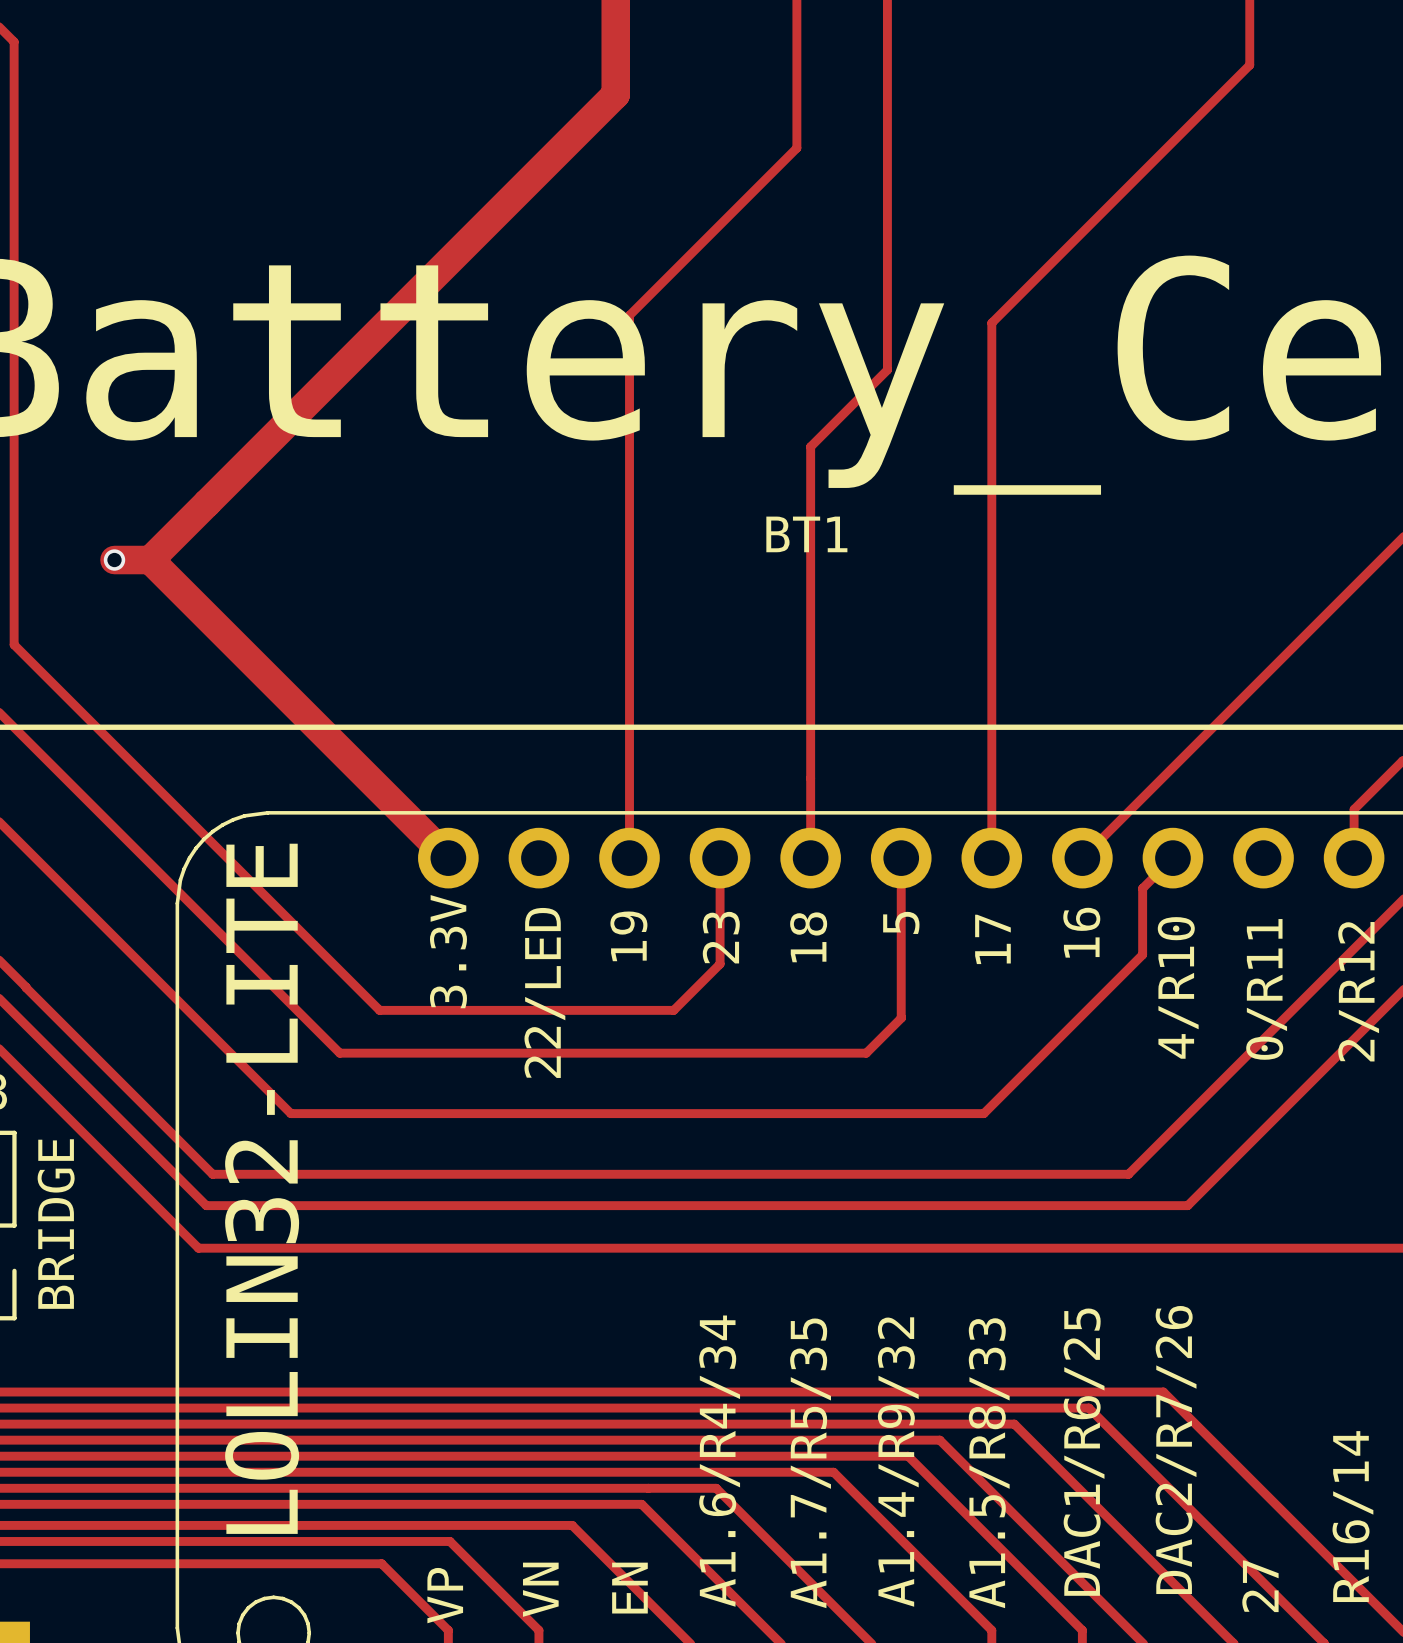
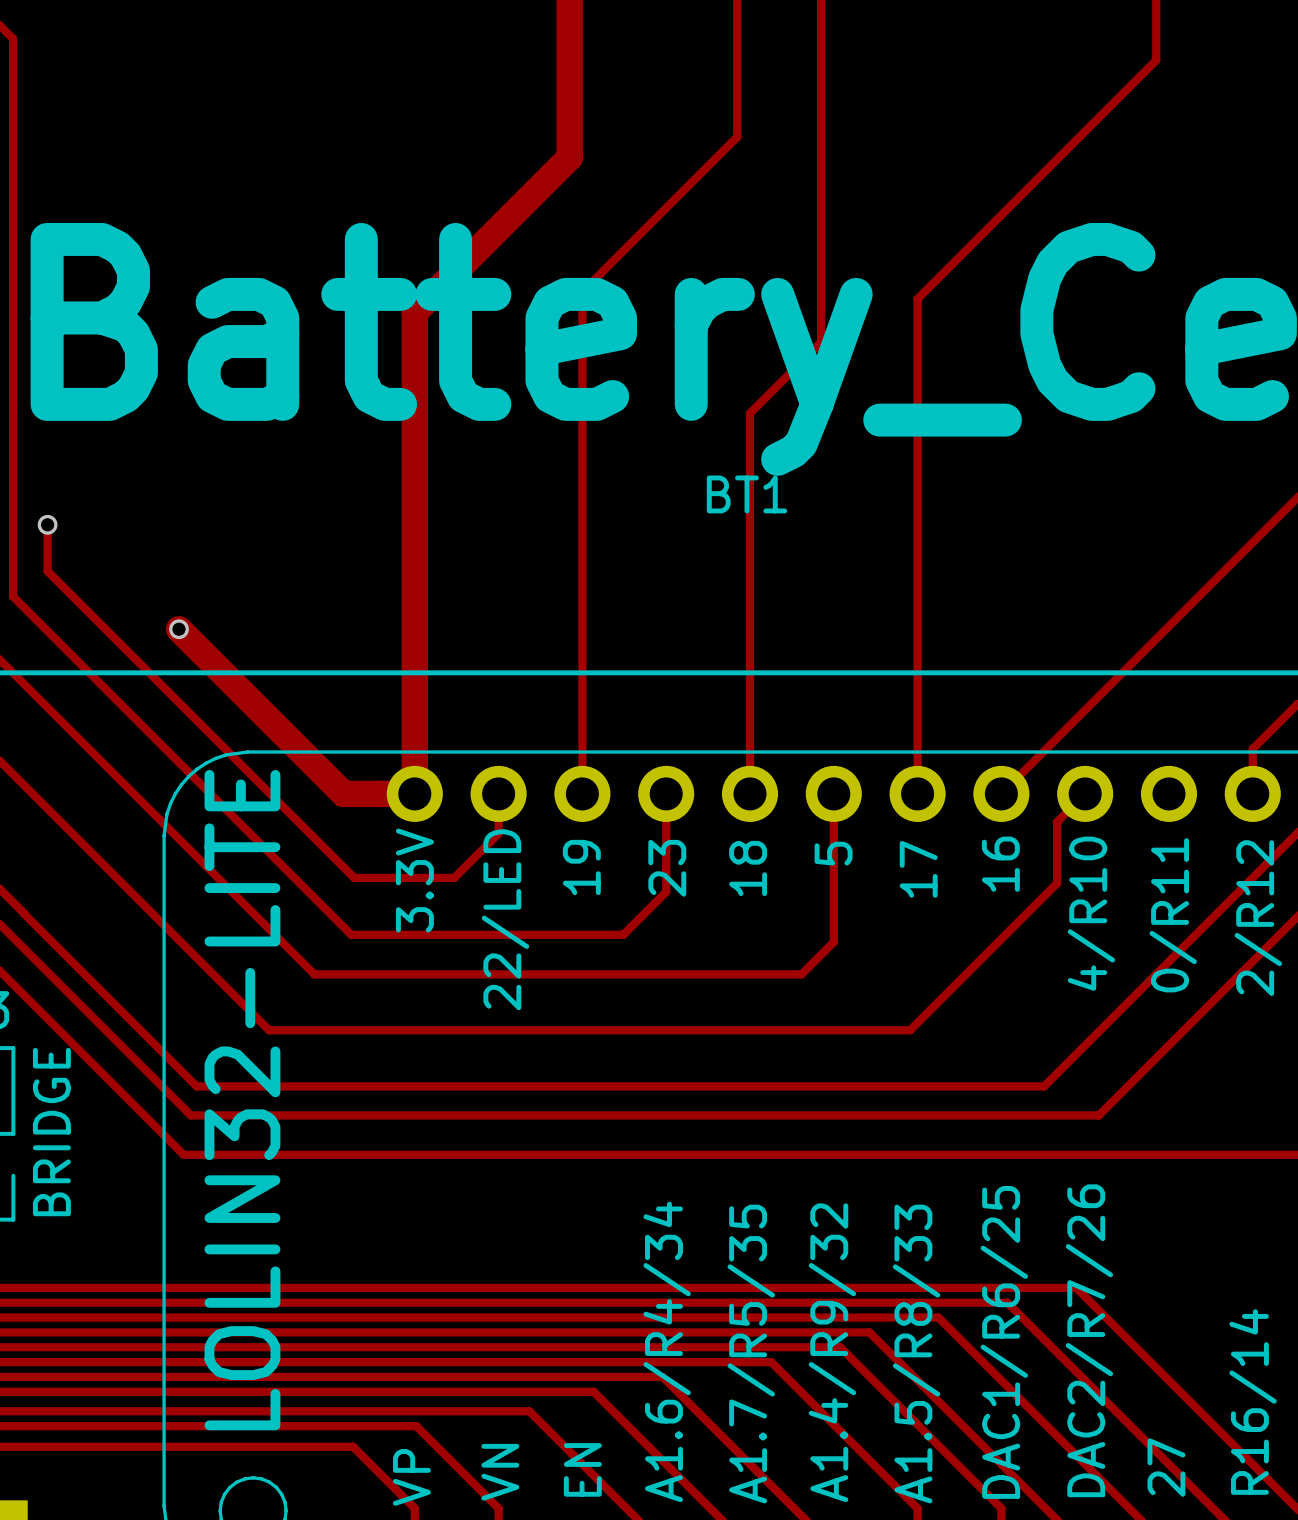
track: (615, 94) (150, 560) -> (569, 87) (569, 157) (414, 312) (414, 793) (343, 793) (179, 629)
track: (114, 560) (150, 560) -> none
via position: (114, 560) -> (47, 524)
track: (150, 560) (448, 858) -> none
track: none -> (47, 524) (47, 571) (354, 877) (454, 877) (498, 833) (498, 793)
via: none -> (179, 629)

